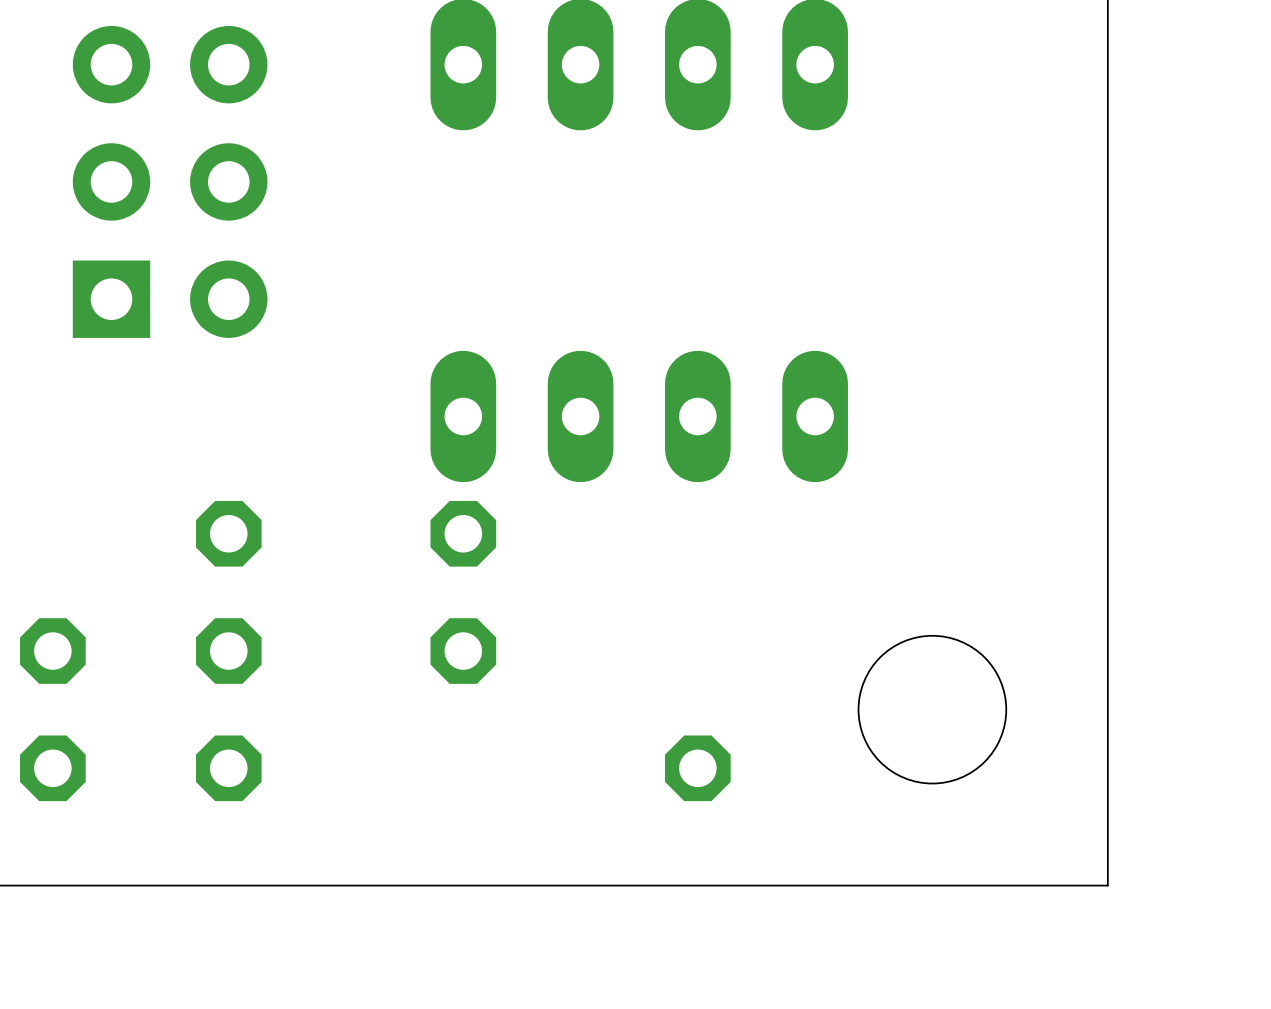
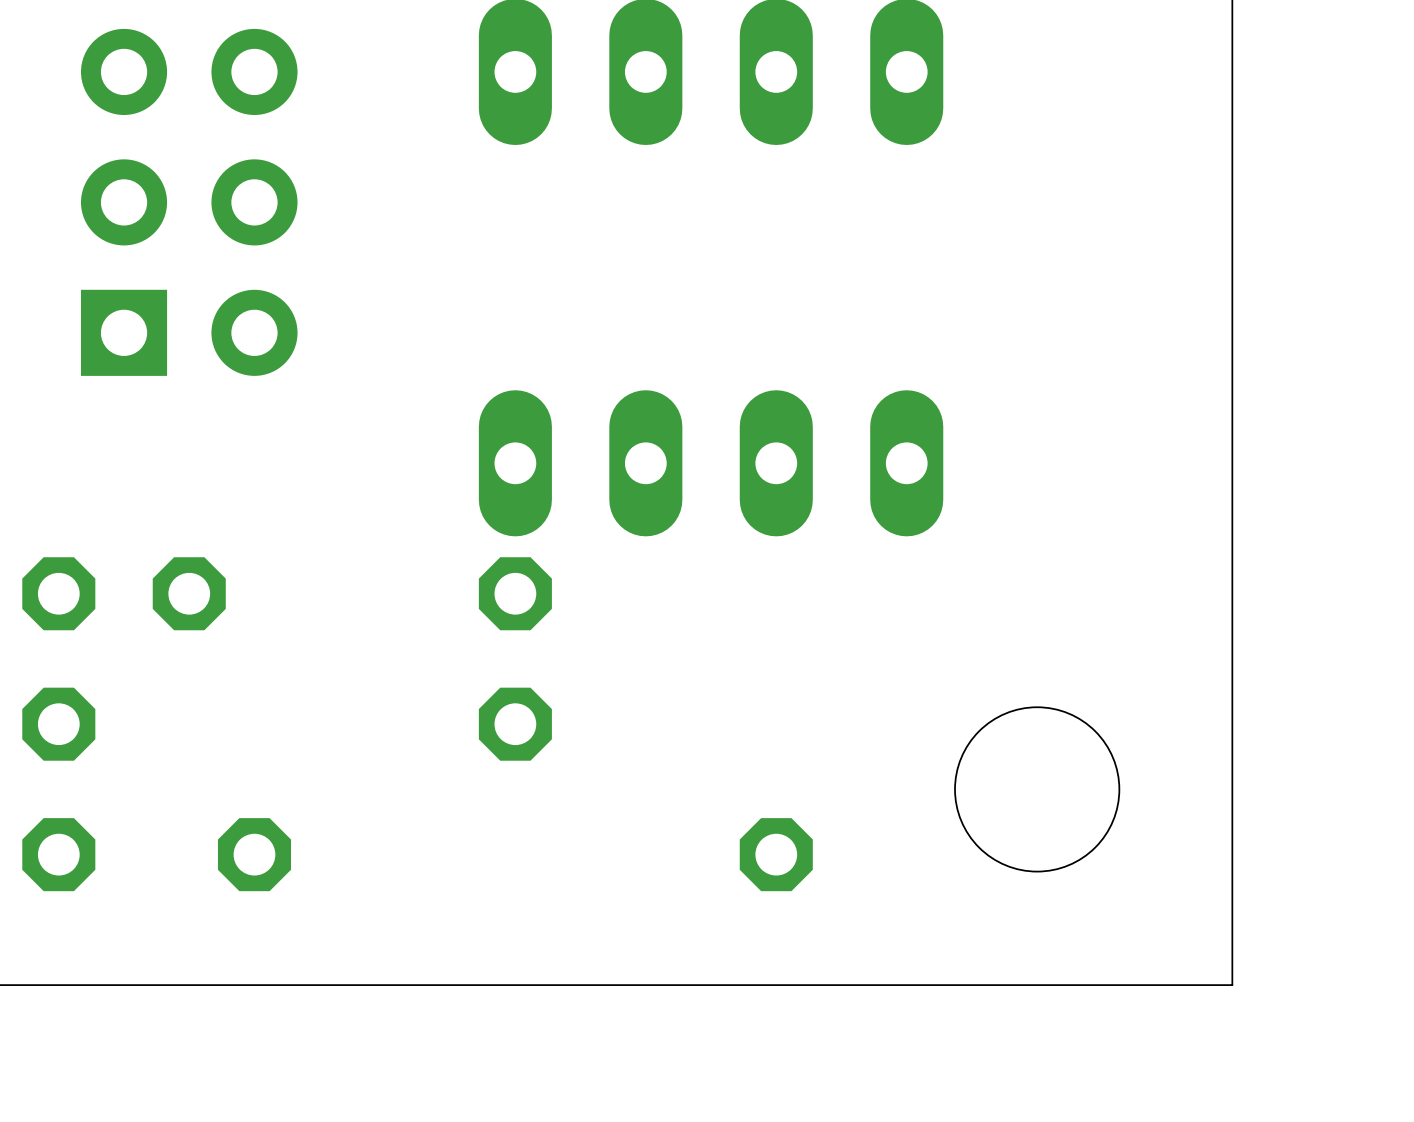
part rotation: 0° (228, 592) -> 90° clockwise (124, 593)
part position: (228, 592) -> (124, 593)

